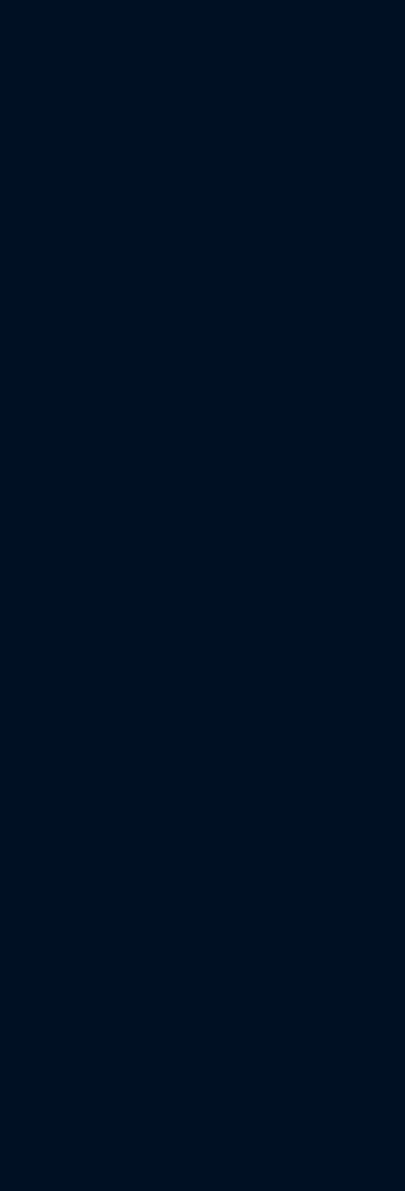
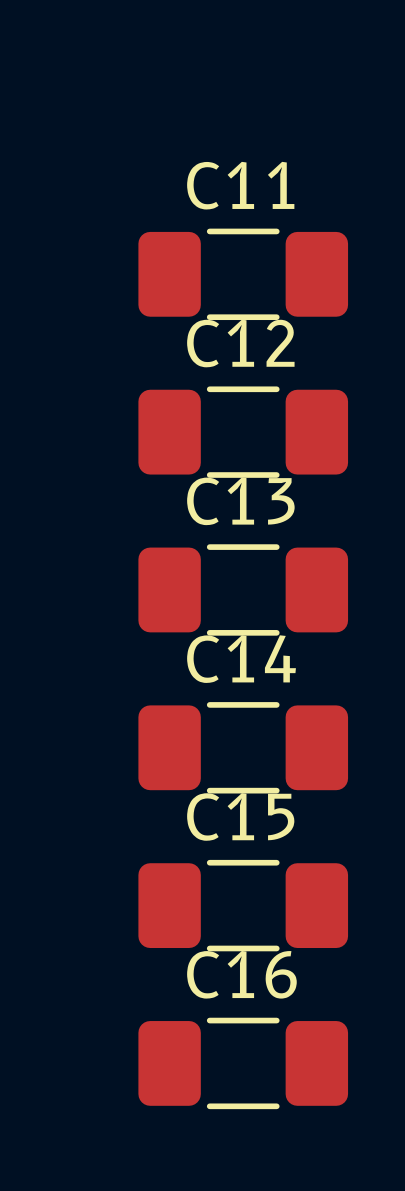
C11: none -> (243, 274)
C12: none -> (243, 432)
C13: none -> (243, 589)
C14: none -> (243, 747)
C15: none -> (243, 905)
C16: none -> (243, 1063)

